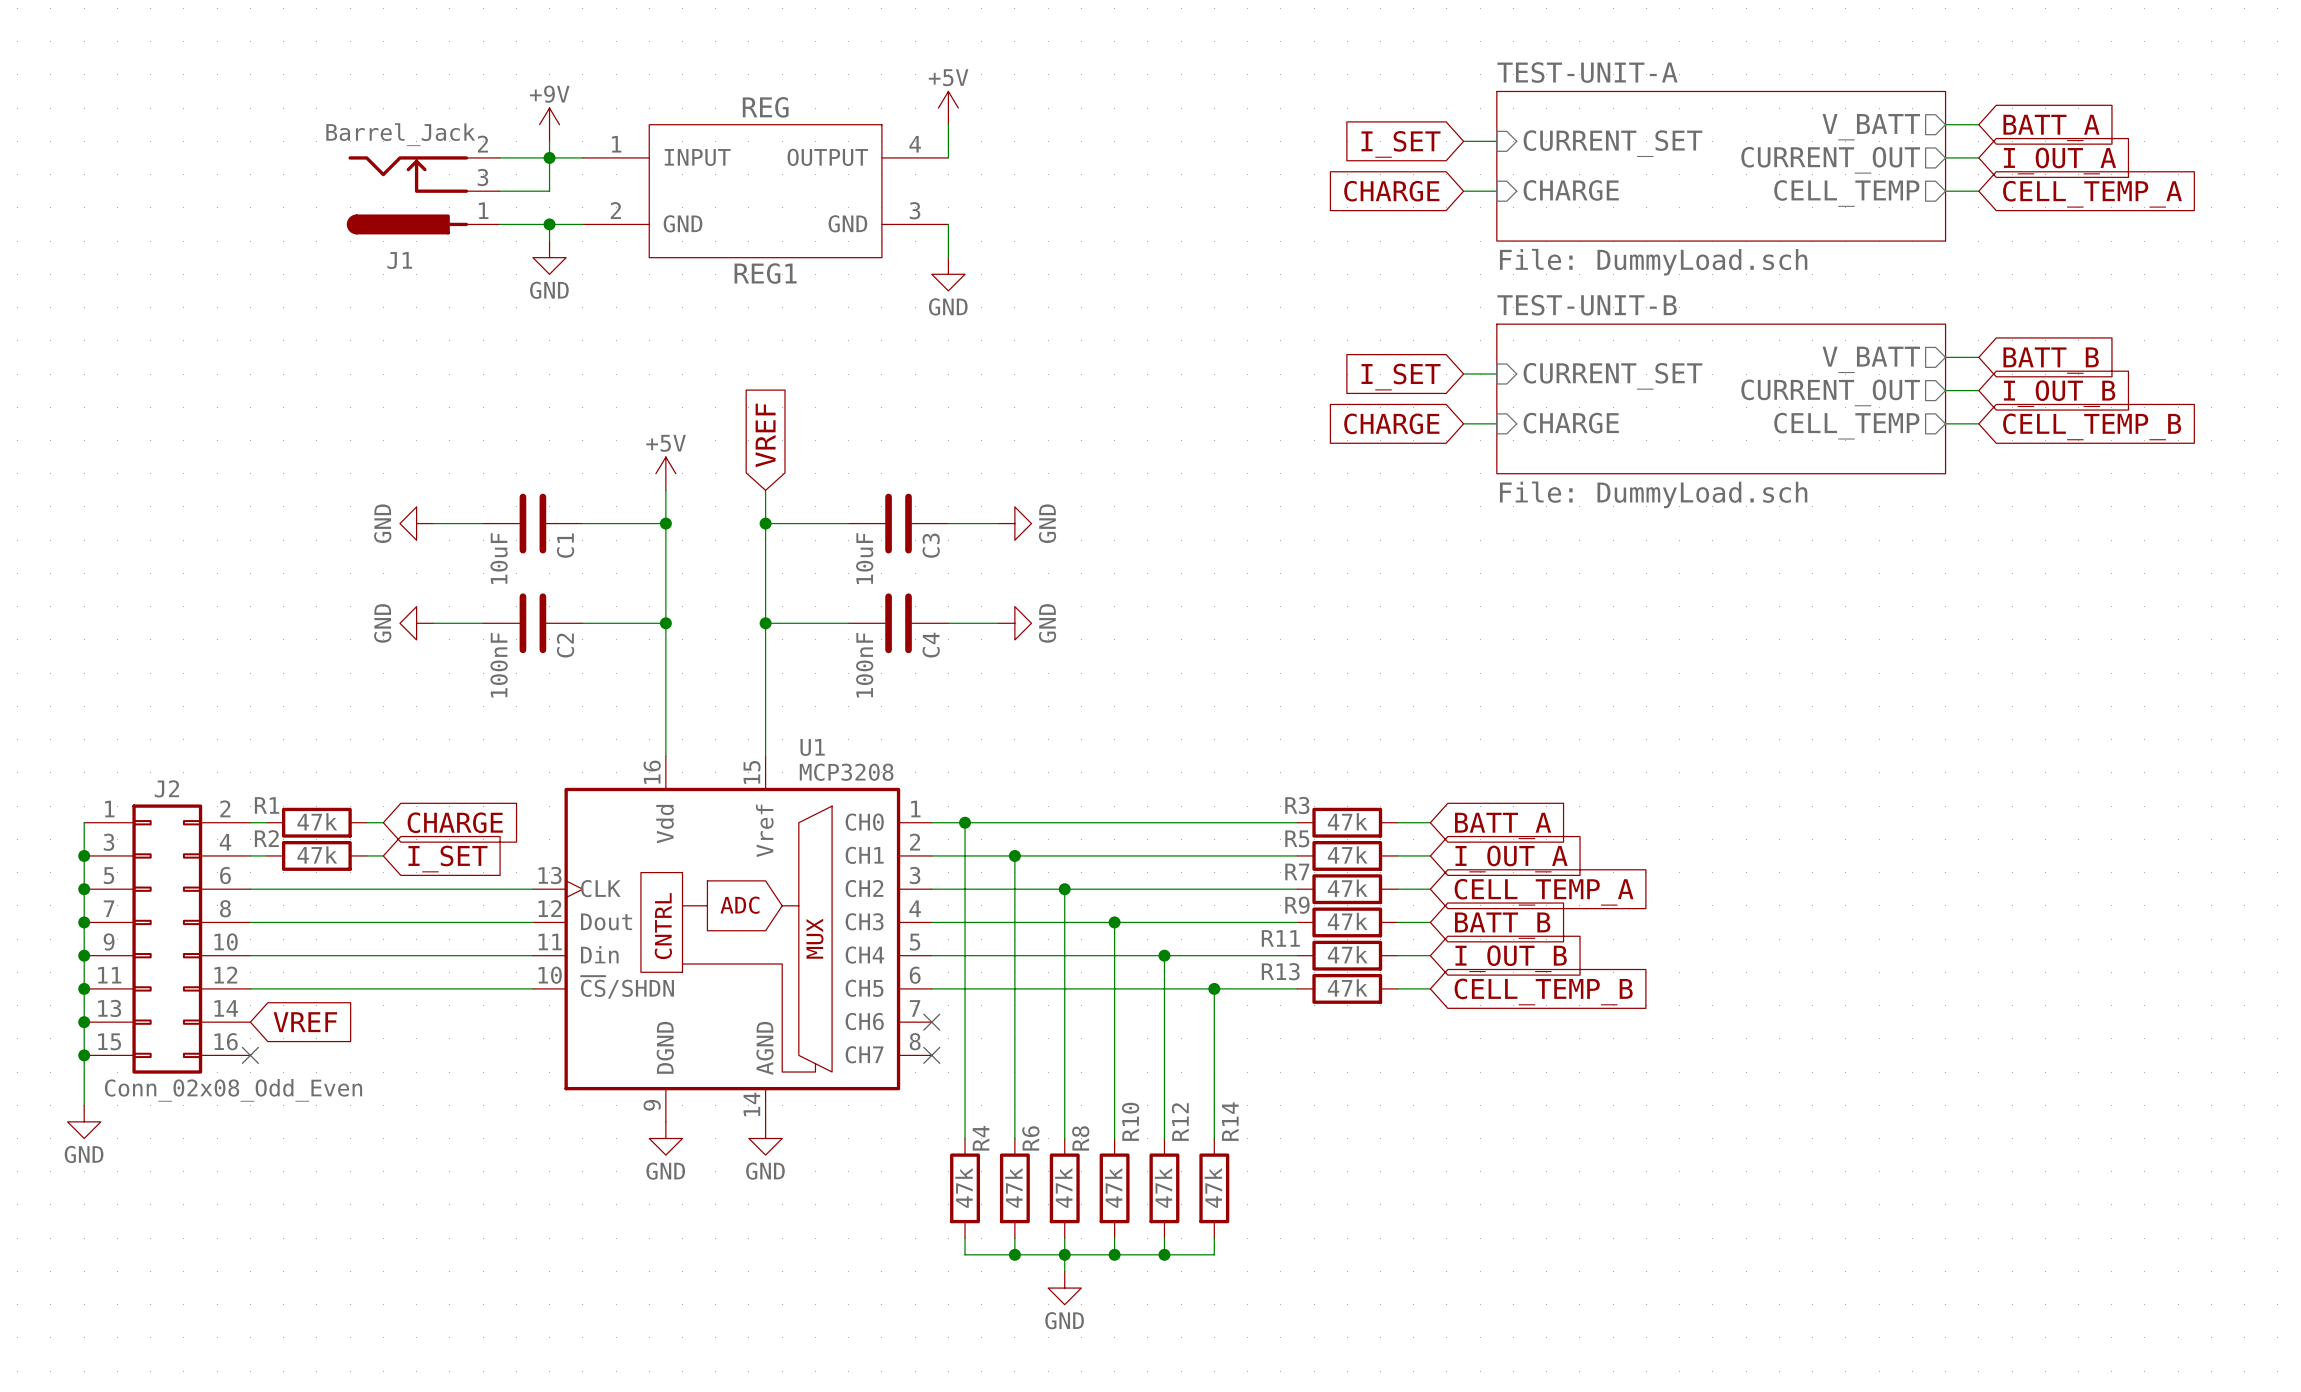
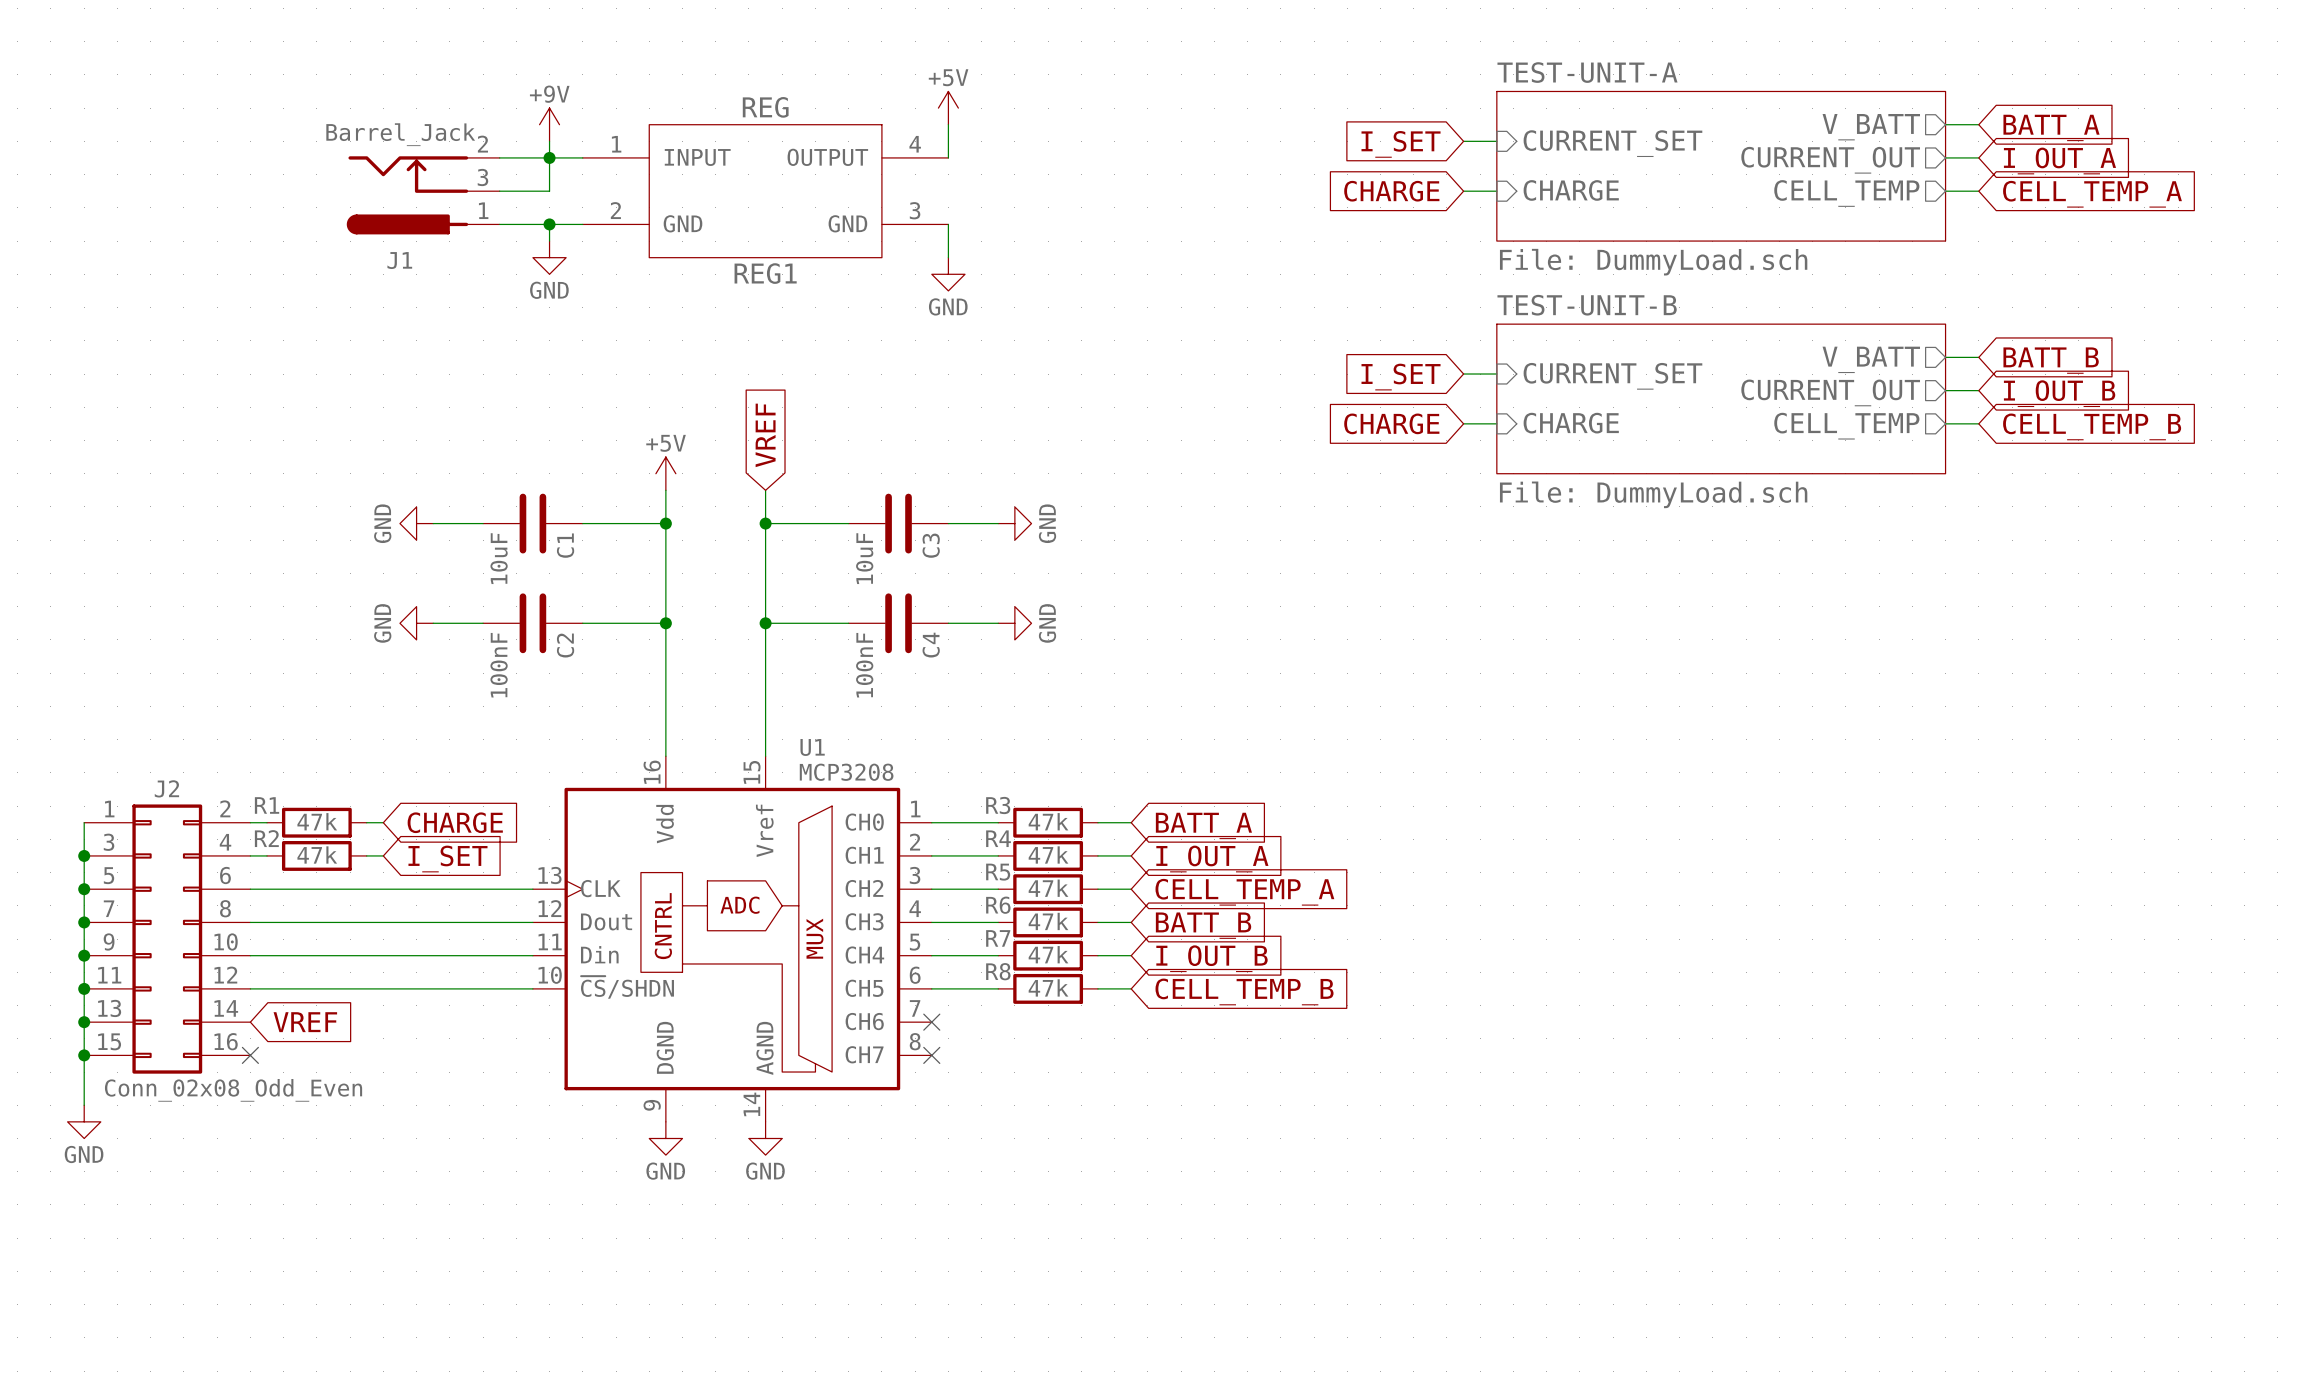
wire: (965, 822) (965, 1138) -> none
junction: (965, 822) -> none
wire: (998, 822) (1097, 822) -> none
wire: (1131, 822) (1297, 822) -> none
R3 position: (1347, 822) -> (1048, 822)
wire: (1397, 822) (1430, 822) -> none
global label position: BATT_A (1503, 825) -> BATT_A (1203, 825)
wire: (998, 855) (1097, 855) -> none
wire: (1014, 855) (1014, 1138) -> none
junction: (1014, 855) -> none
wire: (1131, 855) (1297, 855) -> none
R5 position: (1347, 855) -> (1048, 889)
wire: (1397, 855) (1430, 855) -> none
global label position: I_OUT_A (1511, 859) -> I_OUT_A (1212, 859)
wire: (998, 889) (1097, 889) -> none
wire: (1064, 889) (1064, 1138) -> none
junction: (1064, 889) -> none
wire: (1131, 889) (1297, 889) -> none
R7 position: (1347, 889) -> (1048, 955)
wire: (1397, 889) (1430, 889) -> none
global label position: CELL_TEMP_A (1544, 892) -> CELL_TEMP_A (1244, 892)
wire: (998, 922) (1097, 922) -> none
wire: (1114, 922) (1114, 1138) -> none
junction: (1114, 922) -> none
wire: (1131, 922) (1297, 922) -> none
R9: 47k (1347, 922) -> none
wire: (1397, 922) (1430, 922) -> none
global label position: BATT_B (1502, 925) -> BATT_B (1203, 925)
wire: (998, 955) (1097, 955) -> none
wire: (1131, 955) (1297, 955) -> none
wire: (1164, 955) (1164, 1138) -> none
junction: (1164, 955) -> none
R11: 47k (1347, 955) -> none
wire: (1397, 955) (1430, 955) -> none
global label position: I_OUT_B (1511, 958) -> I_OUT_B (1211, 958)
wire: (998, 988) (1097, 988) -> none
wire: (1131, 988) (1297, 988) -> none
wire: (1214, 988) (1214, 1138) -> none
junction: (1214, 988) -> none
R13: 47k (1347, 988) -> none
wire: (1397, 988) (1430, 988) -> none
global label position: CELL_TEMP_B (1543, 991) -> CELL_TEMP_B (1244, 991)
R4 name position: R4 (981, 1138) -> R4 (998, 838)
R6 name position: R6 (1030, 1138) -> R6 (998, 905)
R8 name position: R8 (1080, 1138) -> R8 (998, 971)
R4 rotation: 0° (965, 1188) -> 90° clockwise (1048, 855)
R4 position: (965, 1188) -> (1048, 855)
R6 rotation: 0° (1014, 1188) -> 90° clockwise (1048, 922)
R6 position: (1014, 1188) -> (1048, 922)
R8 rotation: 0° (1064, 1188) -> 90° clockwise (1048, 988)
R8 position: (1064, 1188) -> (1048, 988)
R10: 47k (1114, 1188) -> none
R12: 47k (1164, 1188) -> none
R14: 47k (1214, 1188) -> none
wire: (965, 1238) (965, 1254) (1214, 1254) (1214, 1238) -> none
wire: (1014, 1238) (1014, 1254) -> none
wire: (1064, 1238) (1064, 1271) -> none
wire: (1114, 1238) (1114, 1254) -> none
wire: (1164, 1238) (1164, 1254) -> none
junction: (1014, 1254) -> none
junction: (1064, 1254) -> none
junction: (1114, 1254) -> none
junction: (1164, 1254) -> none
power symbol: GND (1064, 1288) -> none

